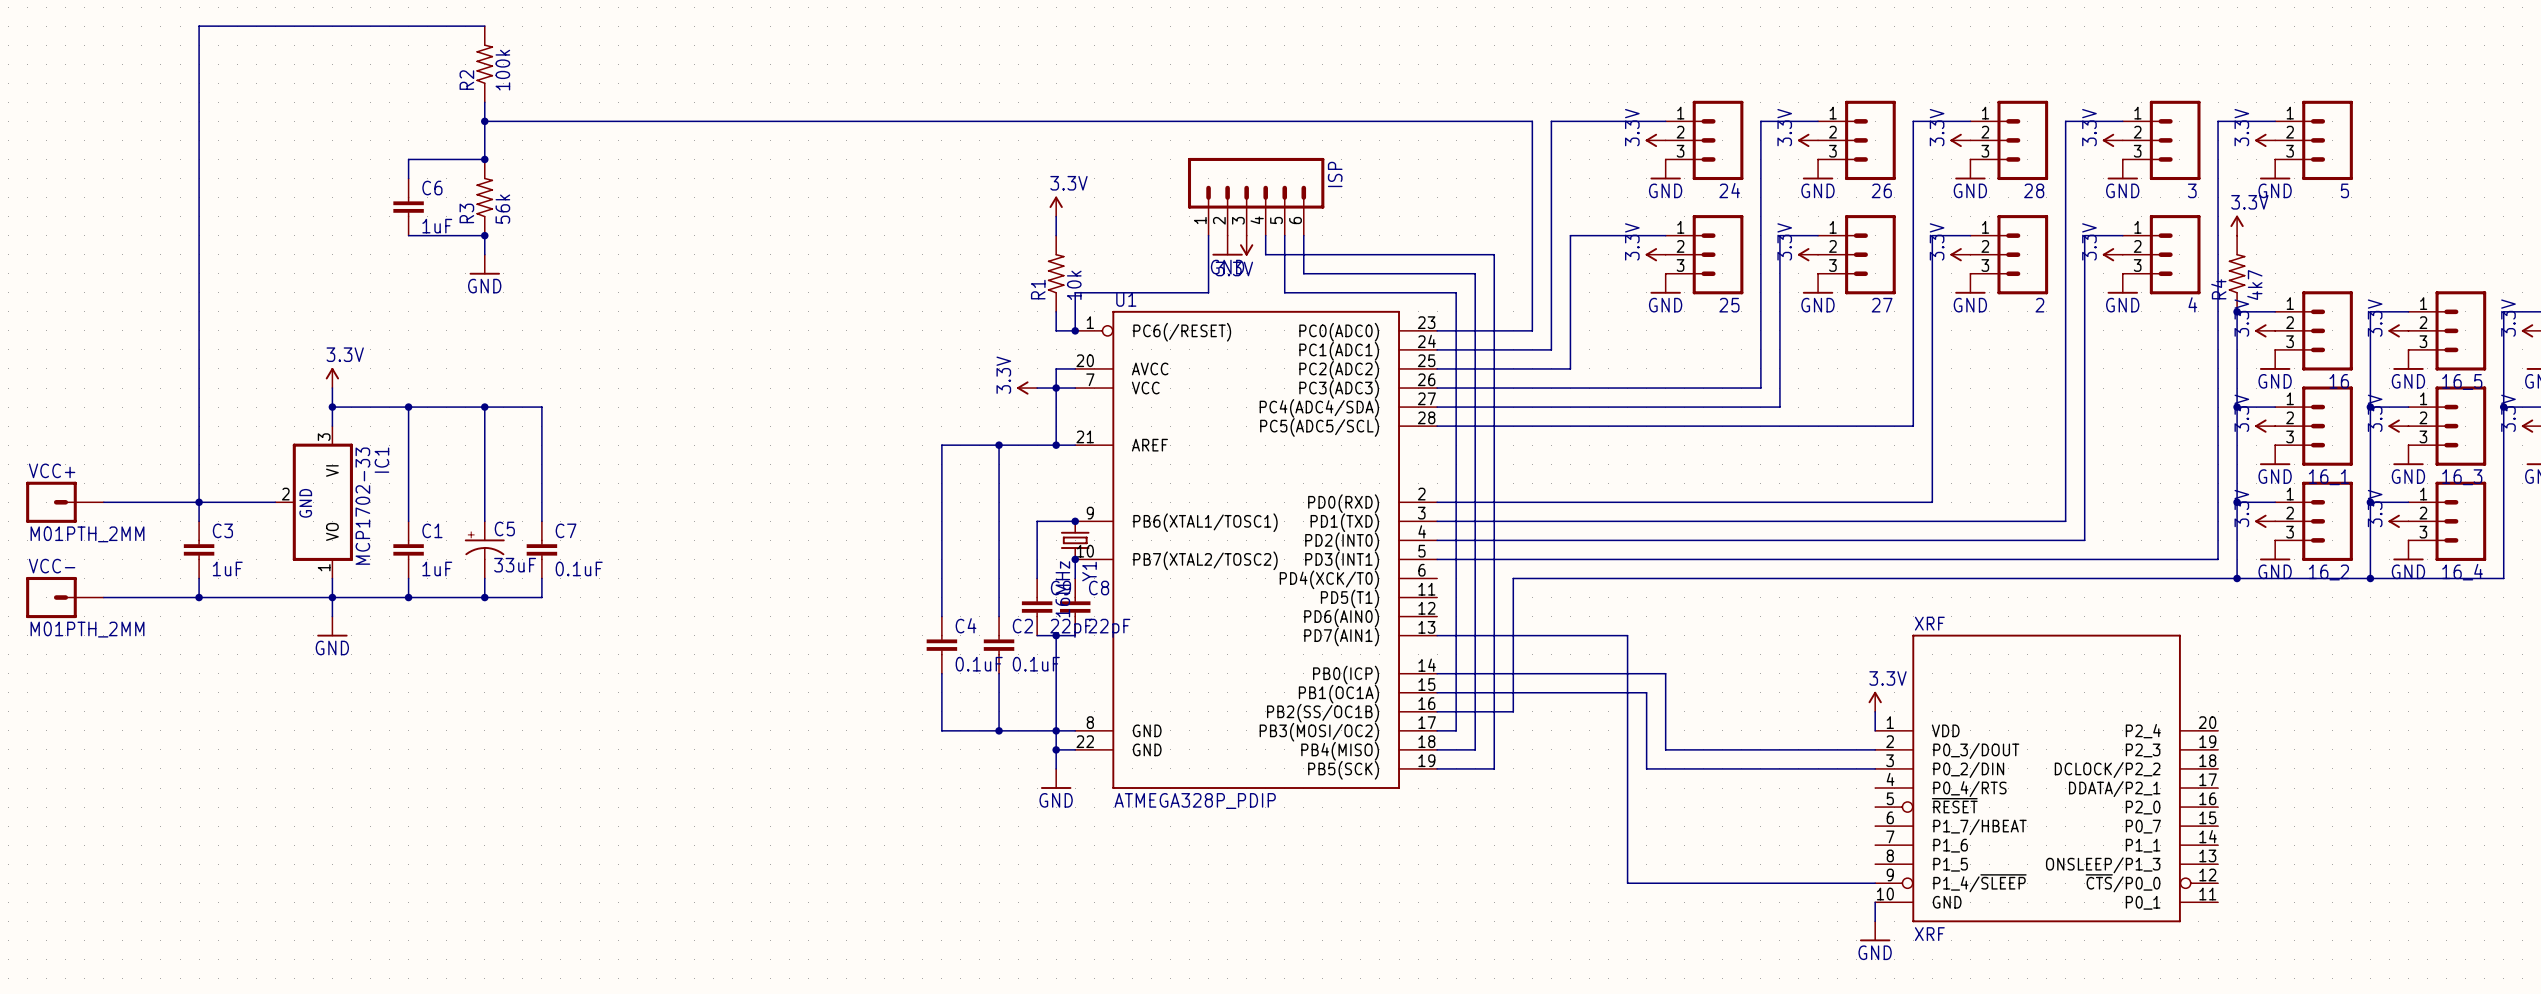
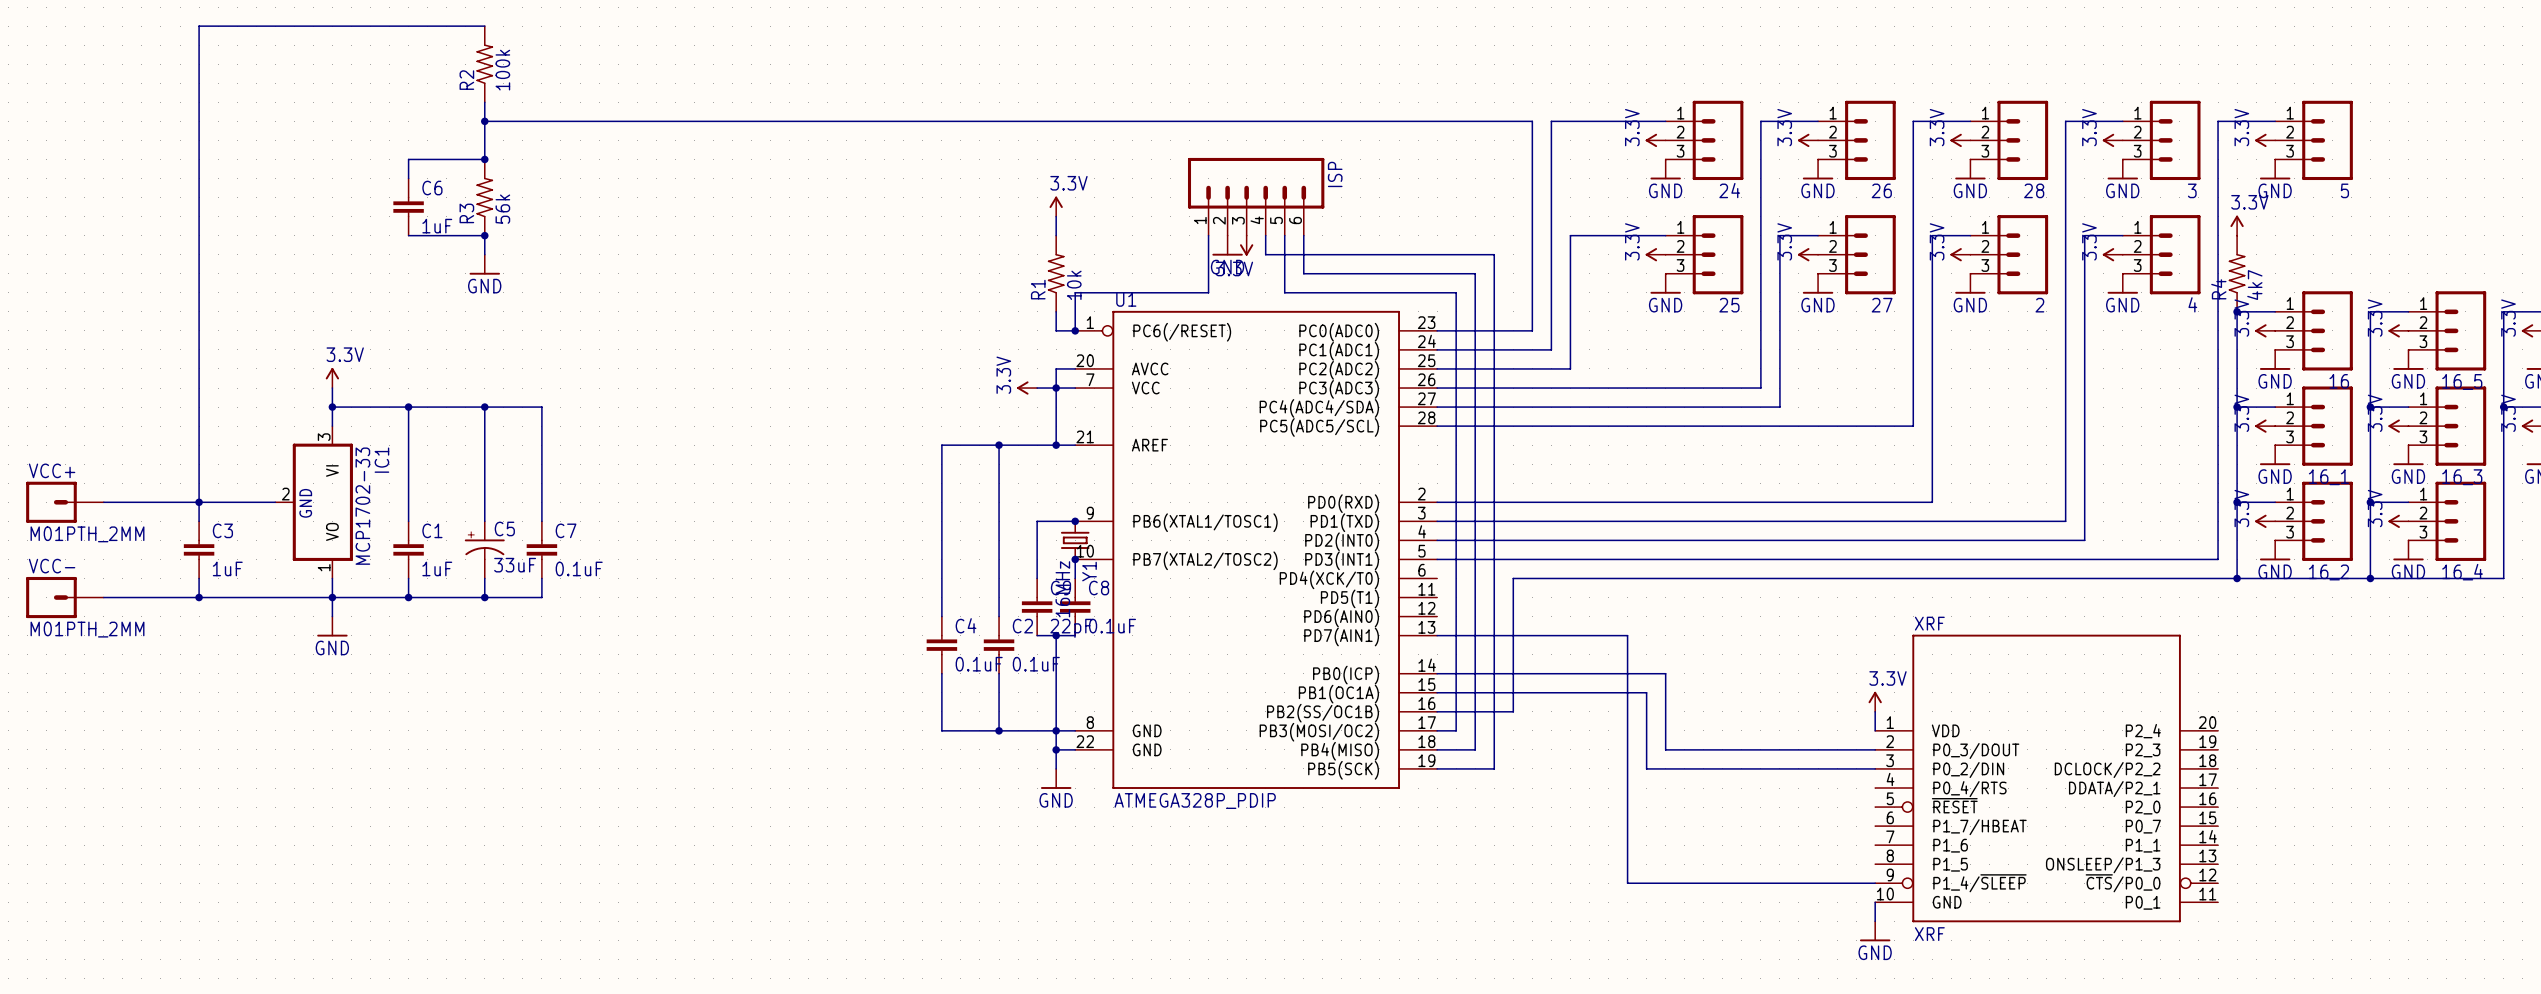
C8 value: 22pF (1109, 628) -> 0.1uF (1112, 626)

